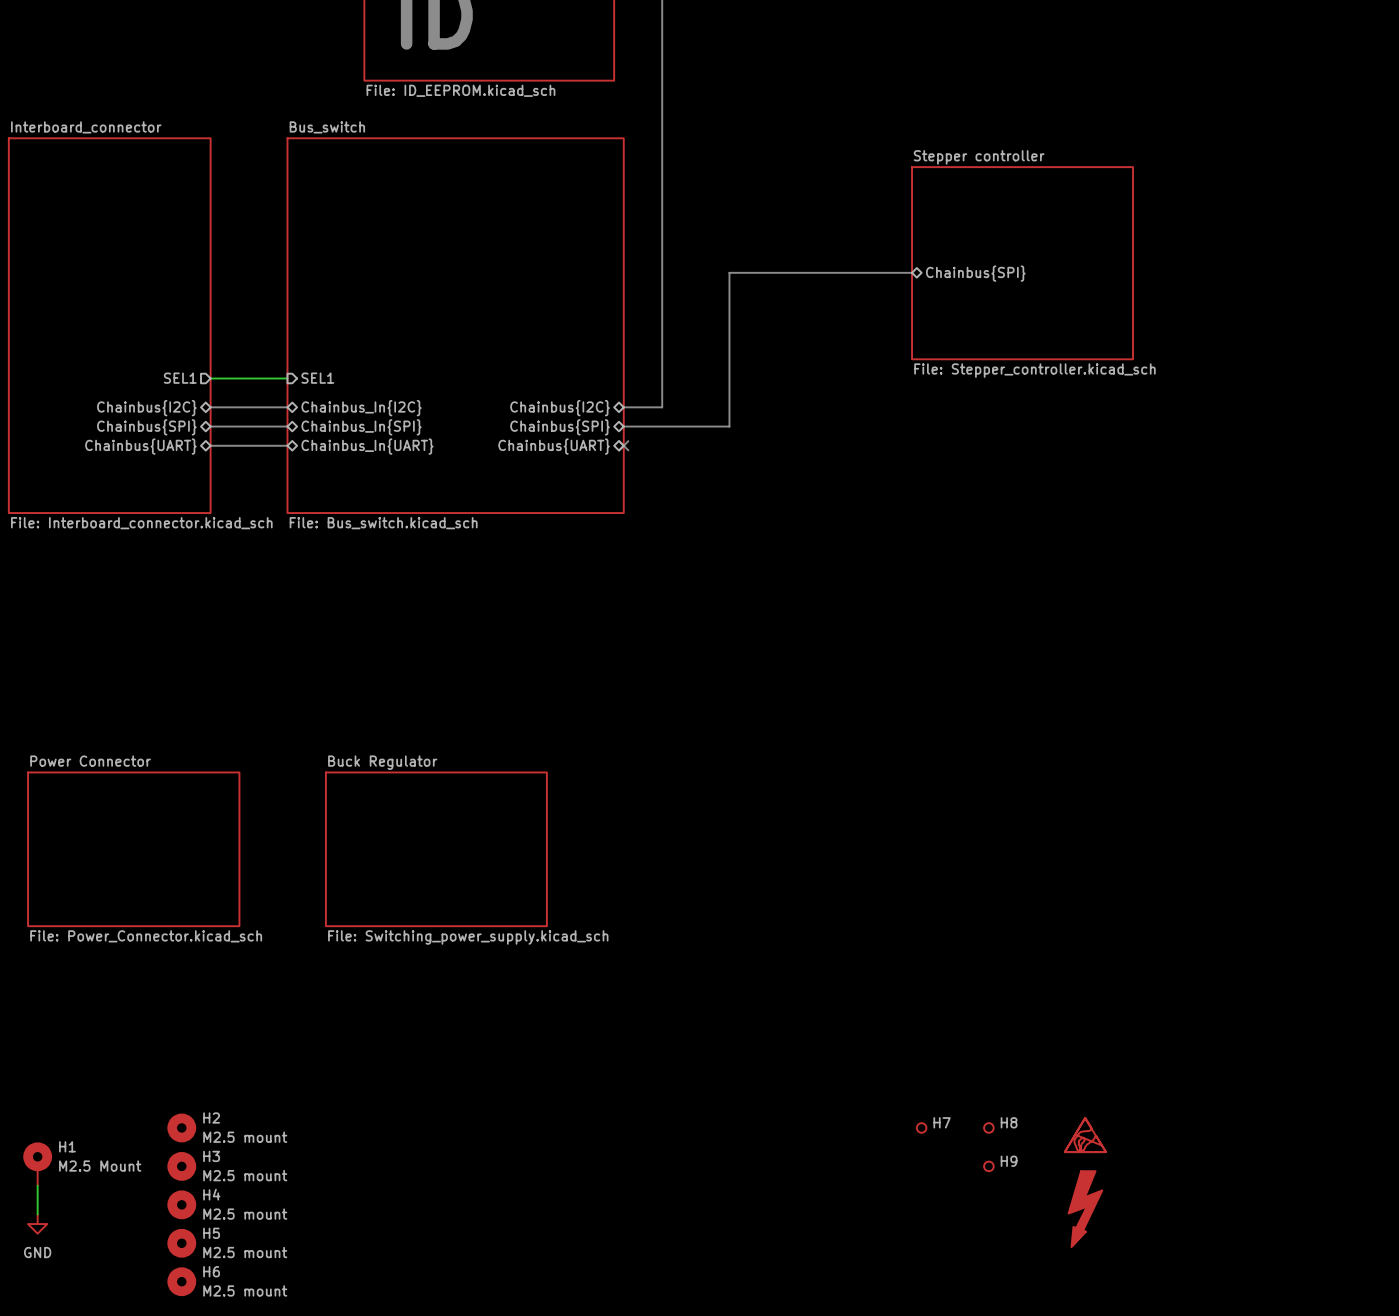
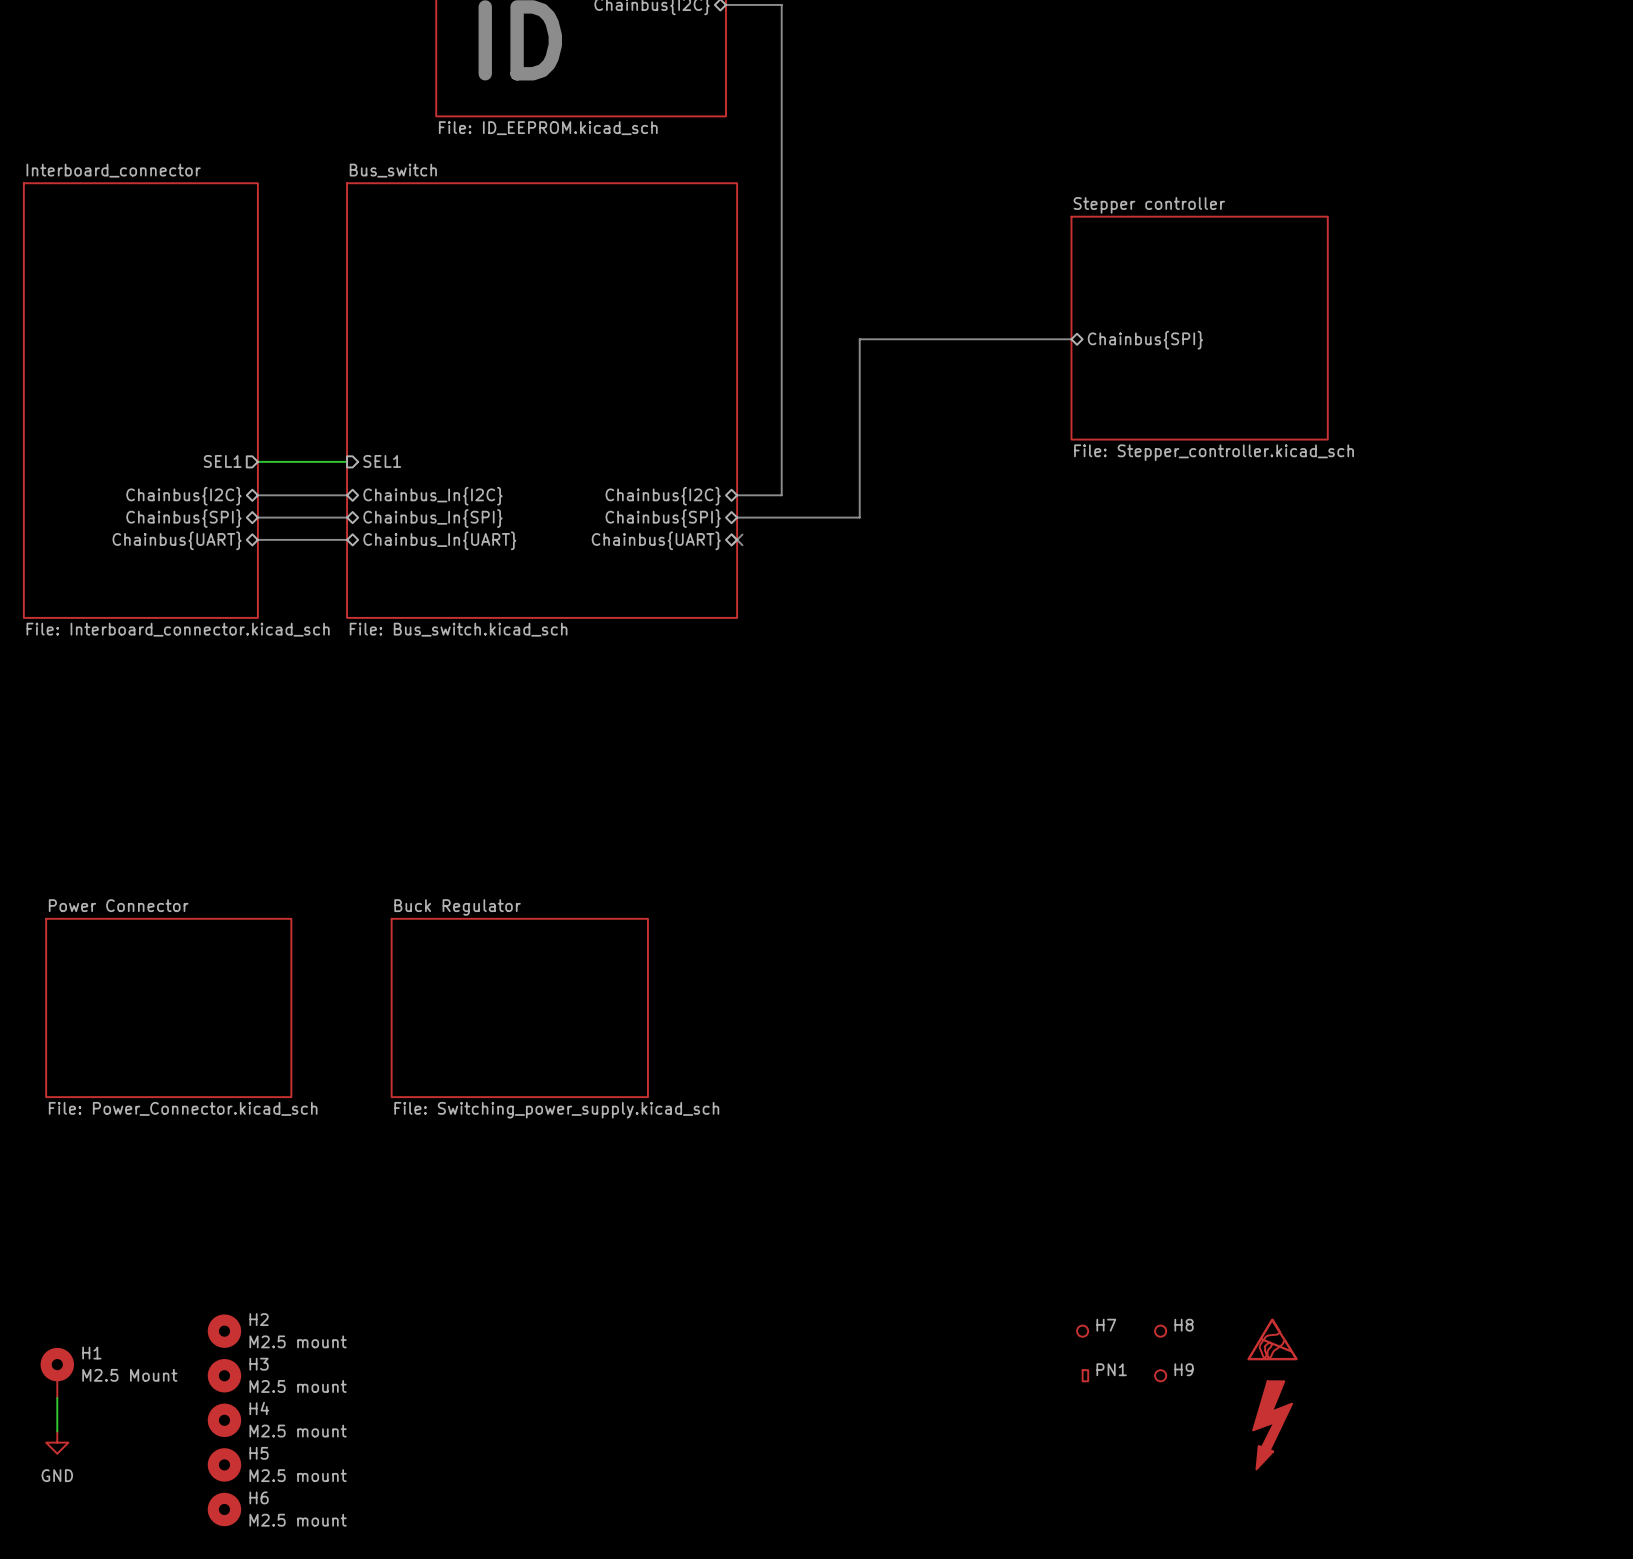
PN1: none -> (1085, 1375)

